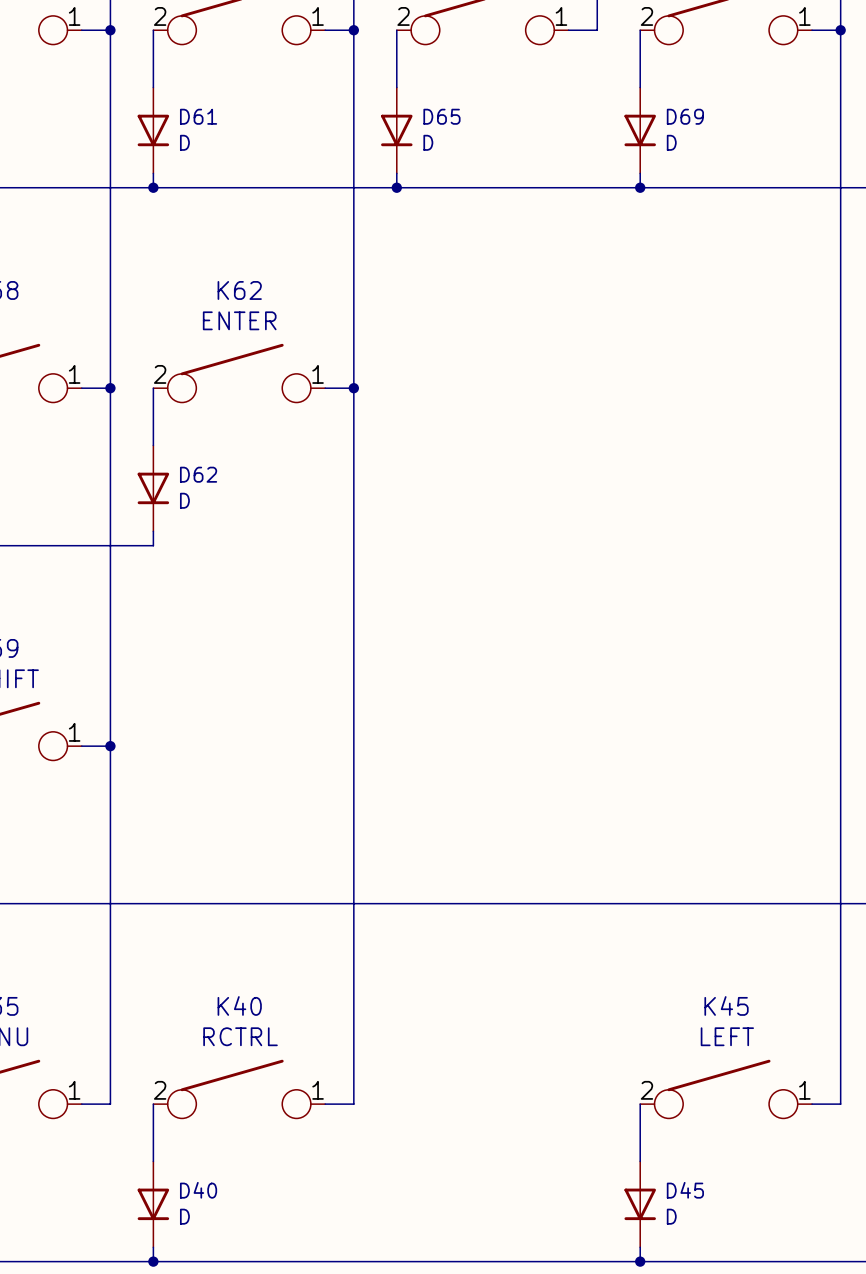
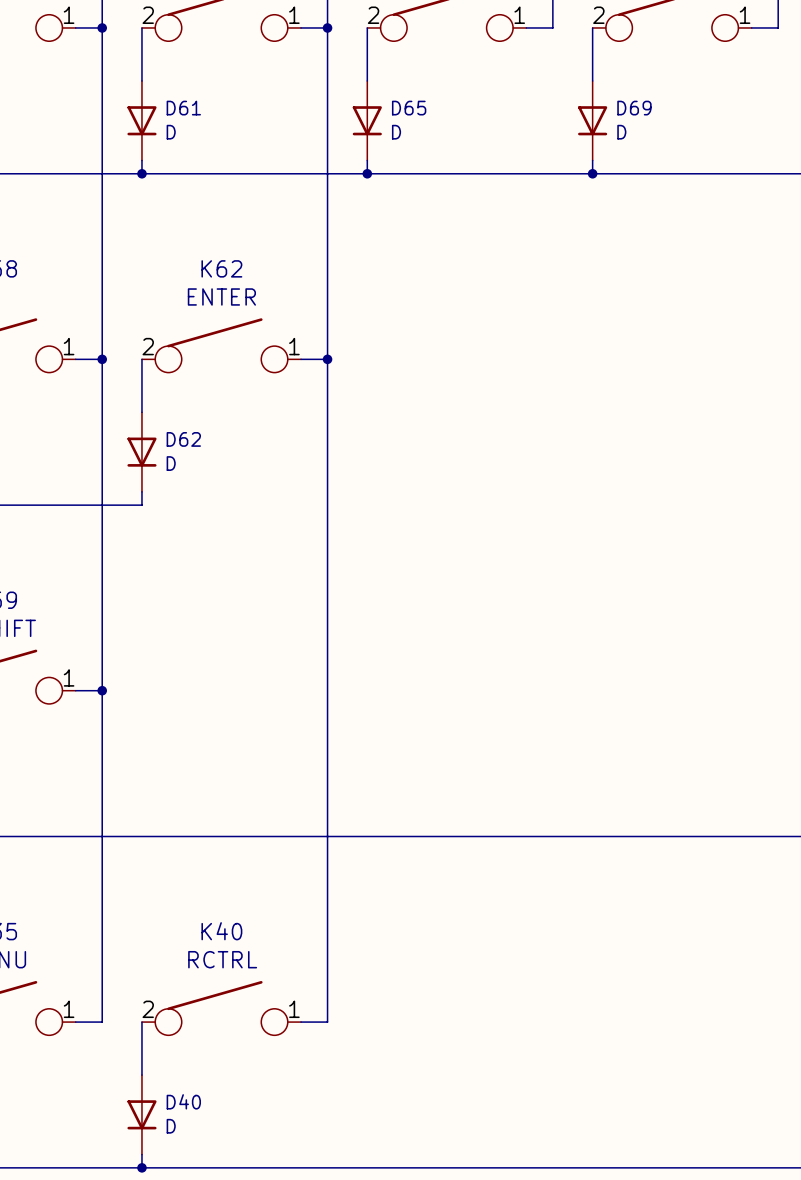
wire: (840, 30) (840, 1104) (812, 1104) -> none
junction: (840, 30) -> none
K45: LEFT (726, 1089) -> none
wire: (640, 1104) (640, 1161) -> none
D45: D (640, 1204) -> none
wire: (640, 1247) (640, 1261) -> none
junction: (640, 1261) -> none

